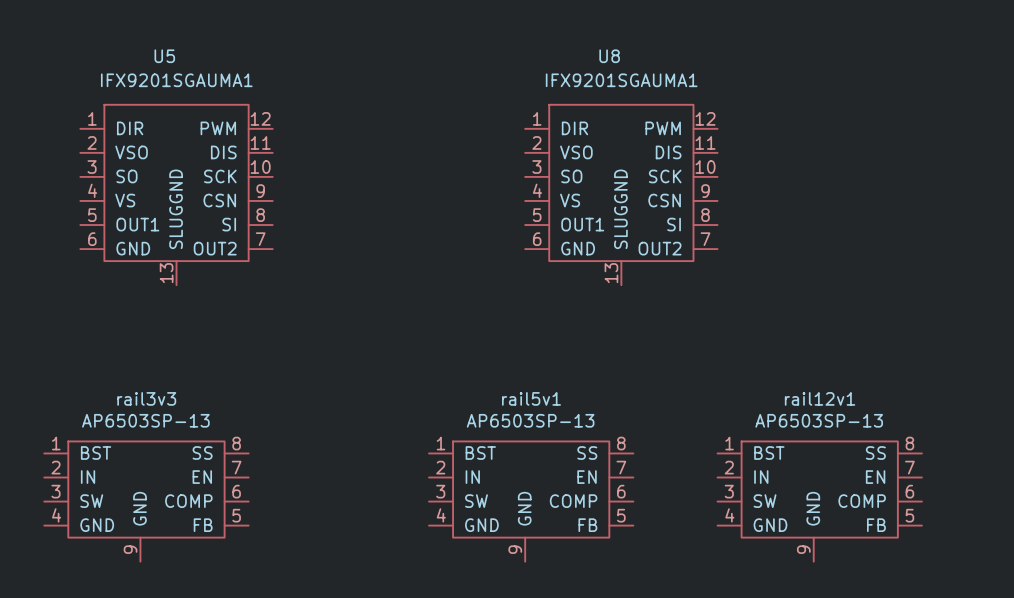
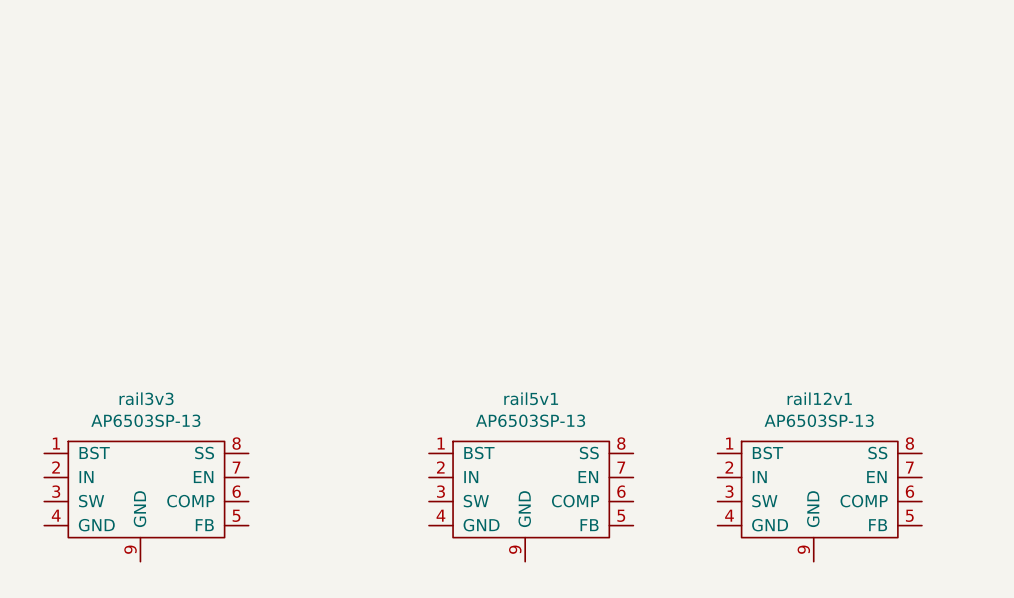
U5: IFX9201SGAUMA1 (302, 164) -> none
U8: IFX9201SGAUMA1 (747, 164) -> none

